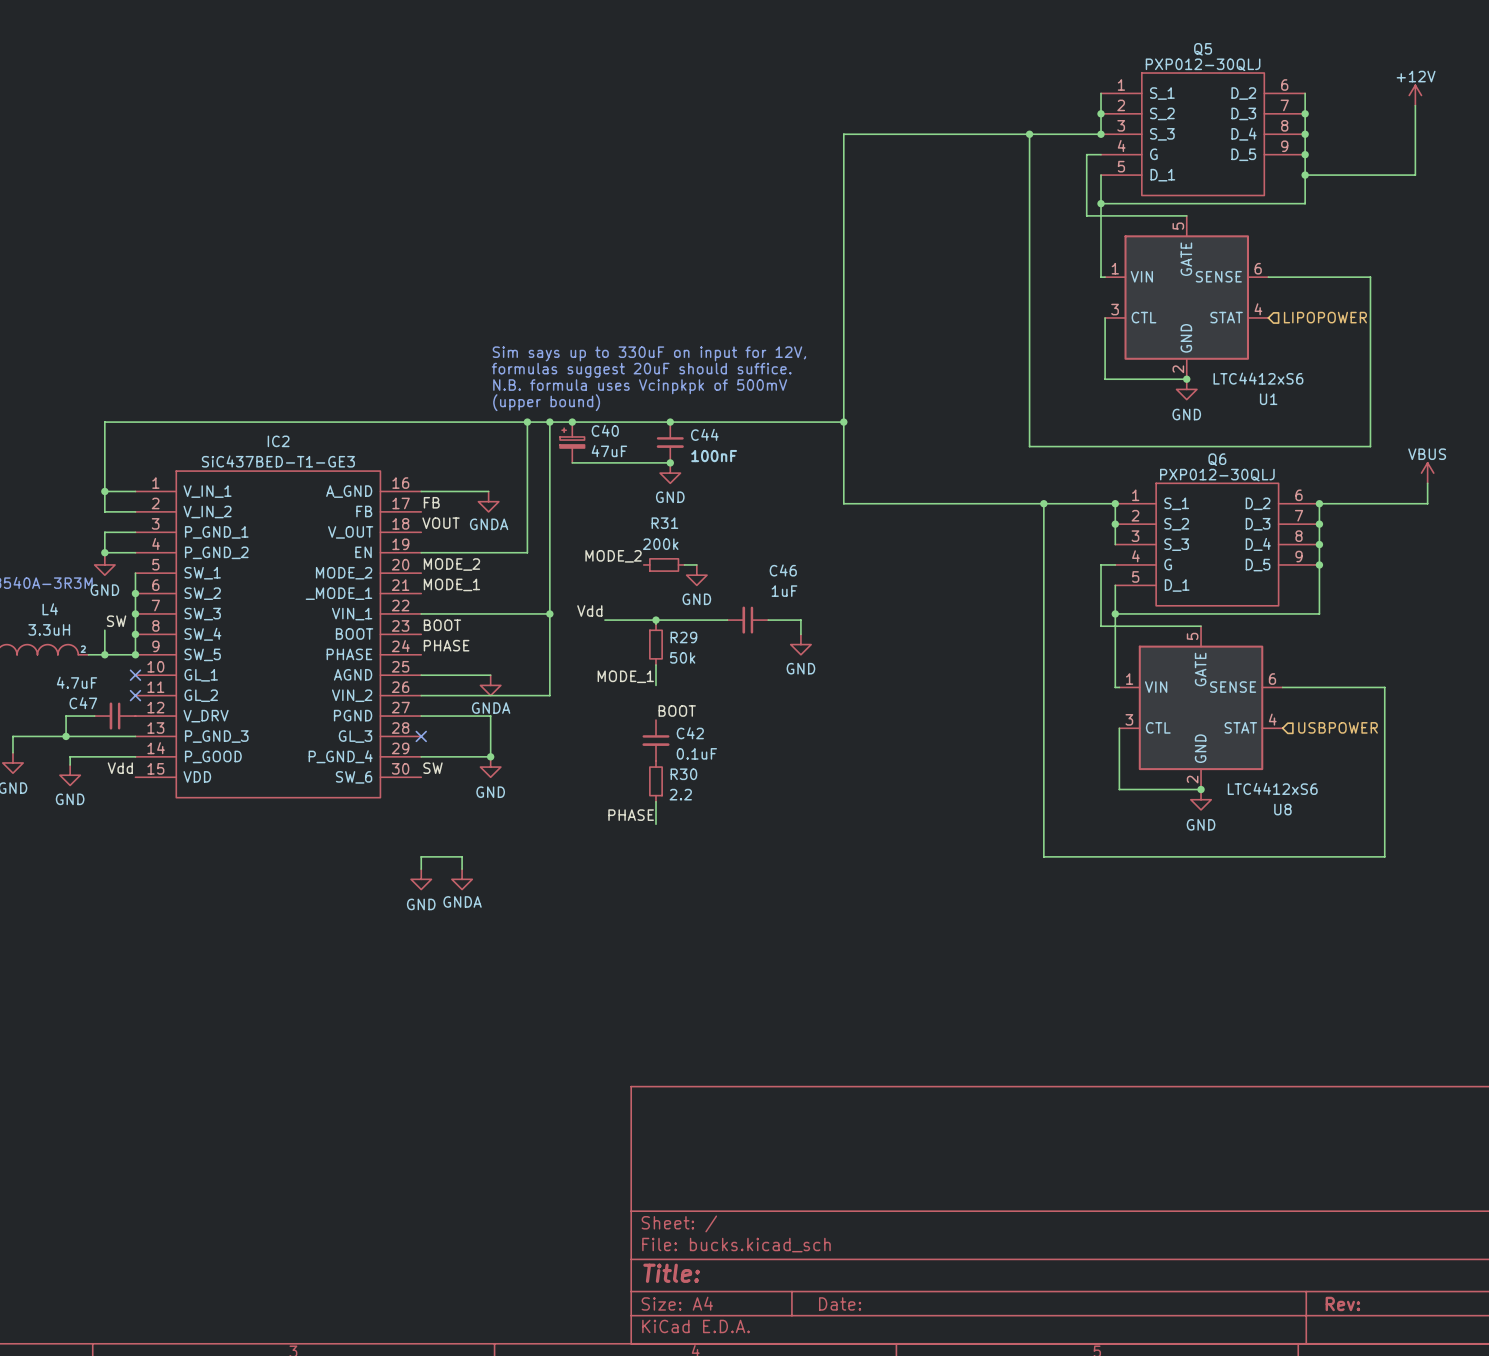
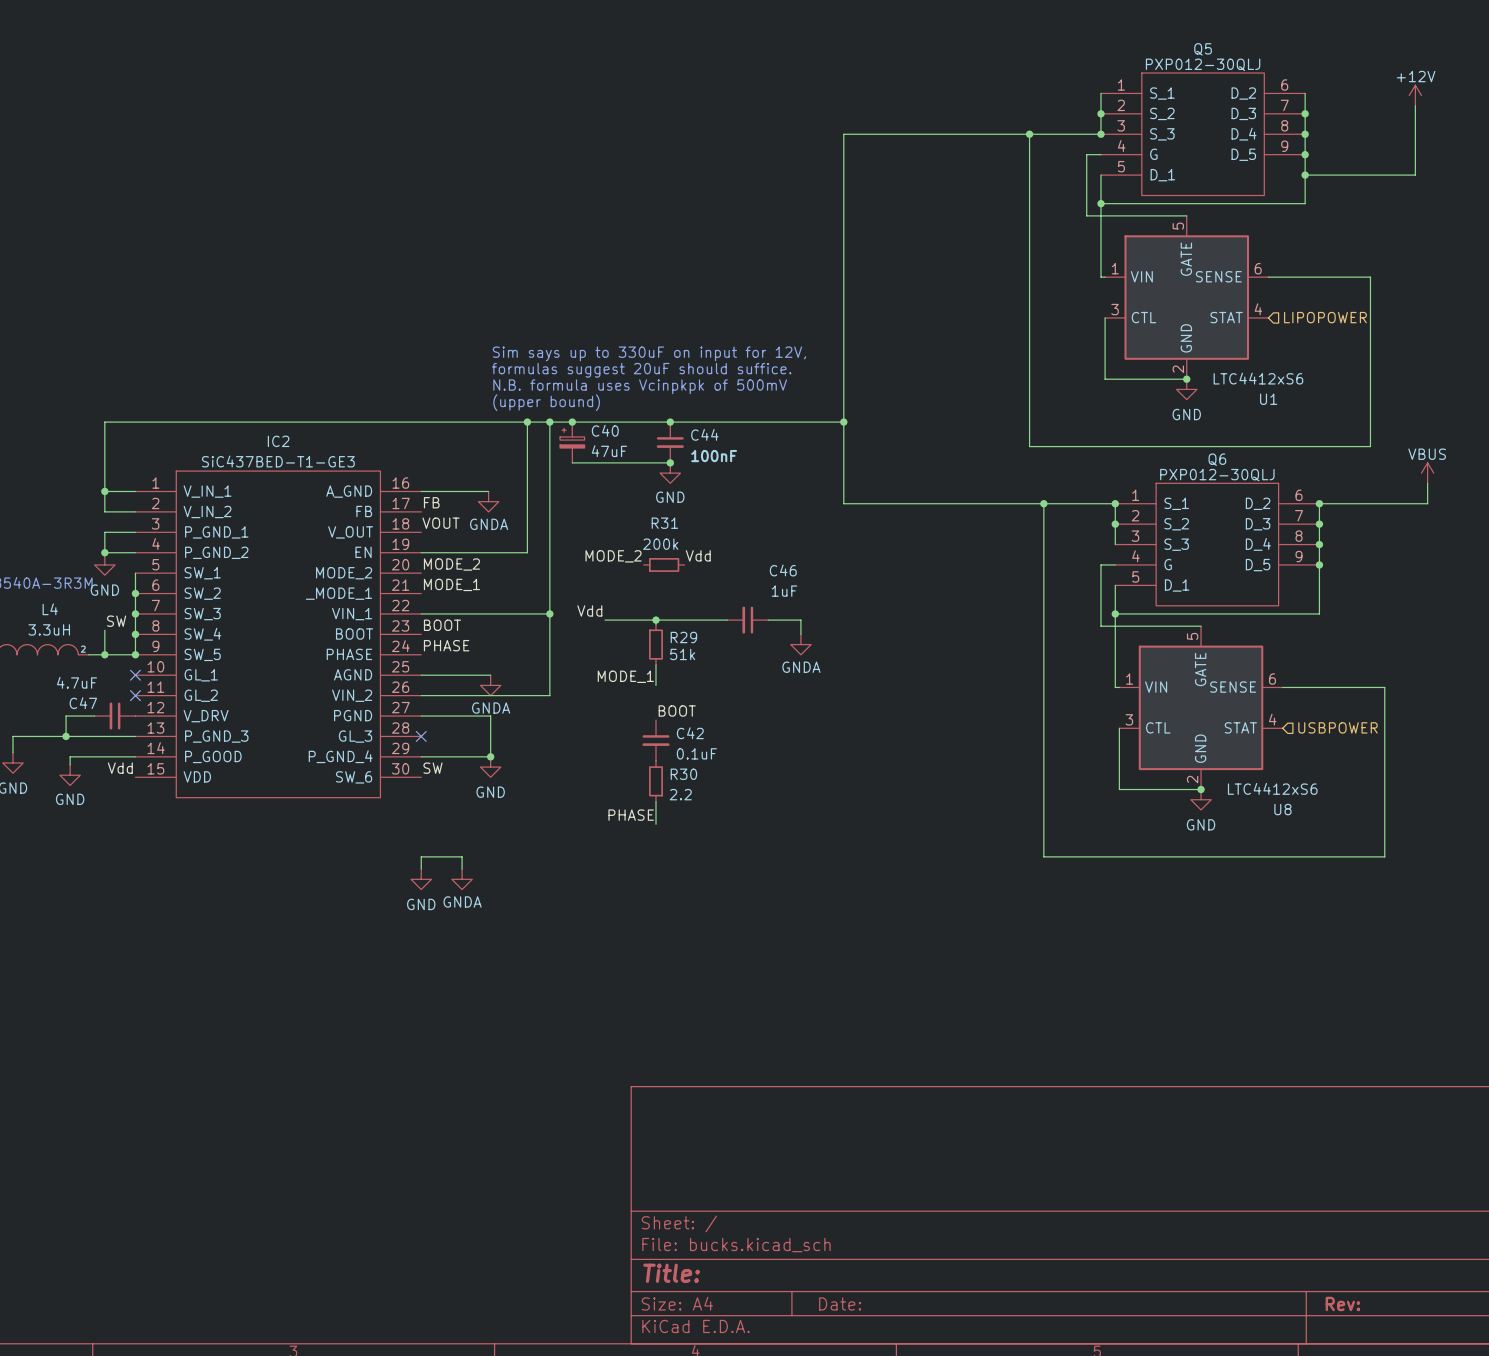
label: none -> Vdd (698, 555)
wire: (684, 564) (696, 564) -> none
power symbol: GND (696, 575) -> none
power symbol: GND (800, 644) -> GNDA (800, 644)
R29 value: 50k (682, 657) -> 51k (682, 654)

